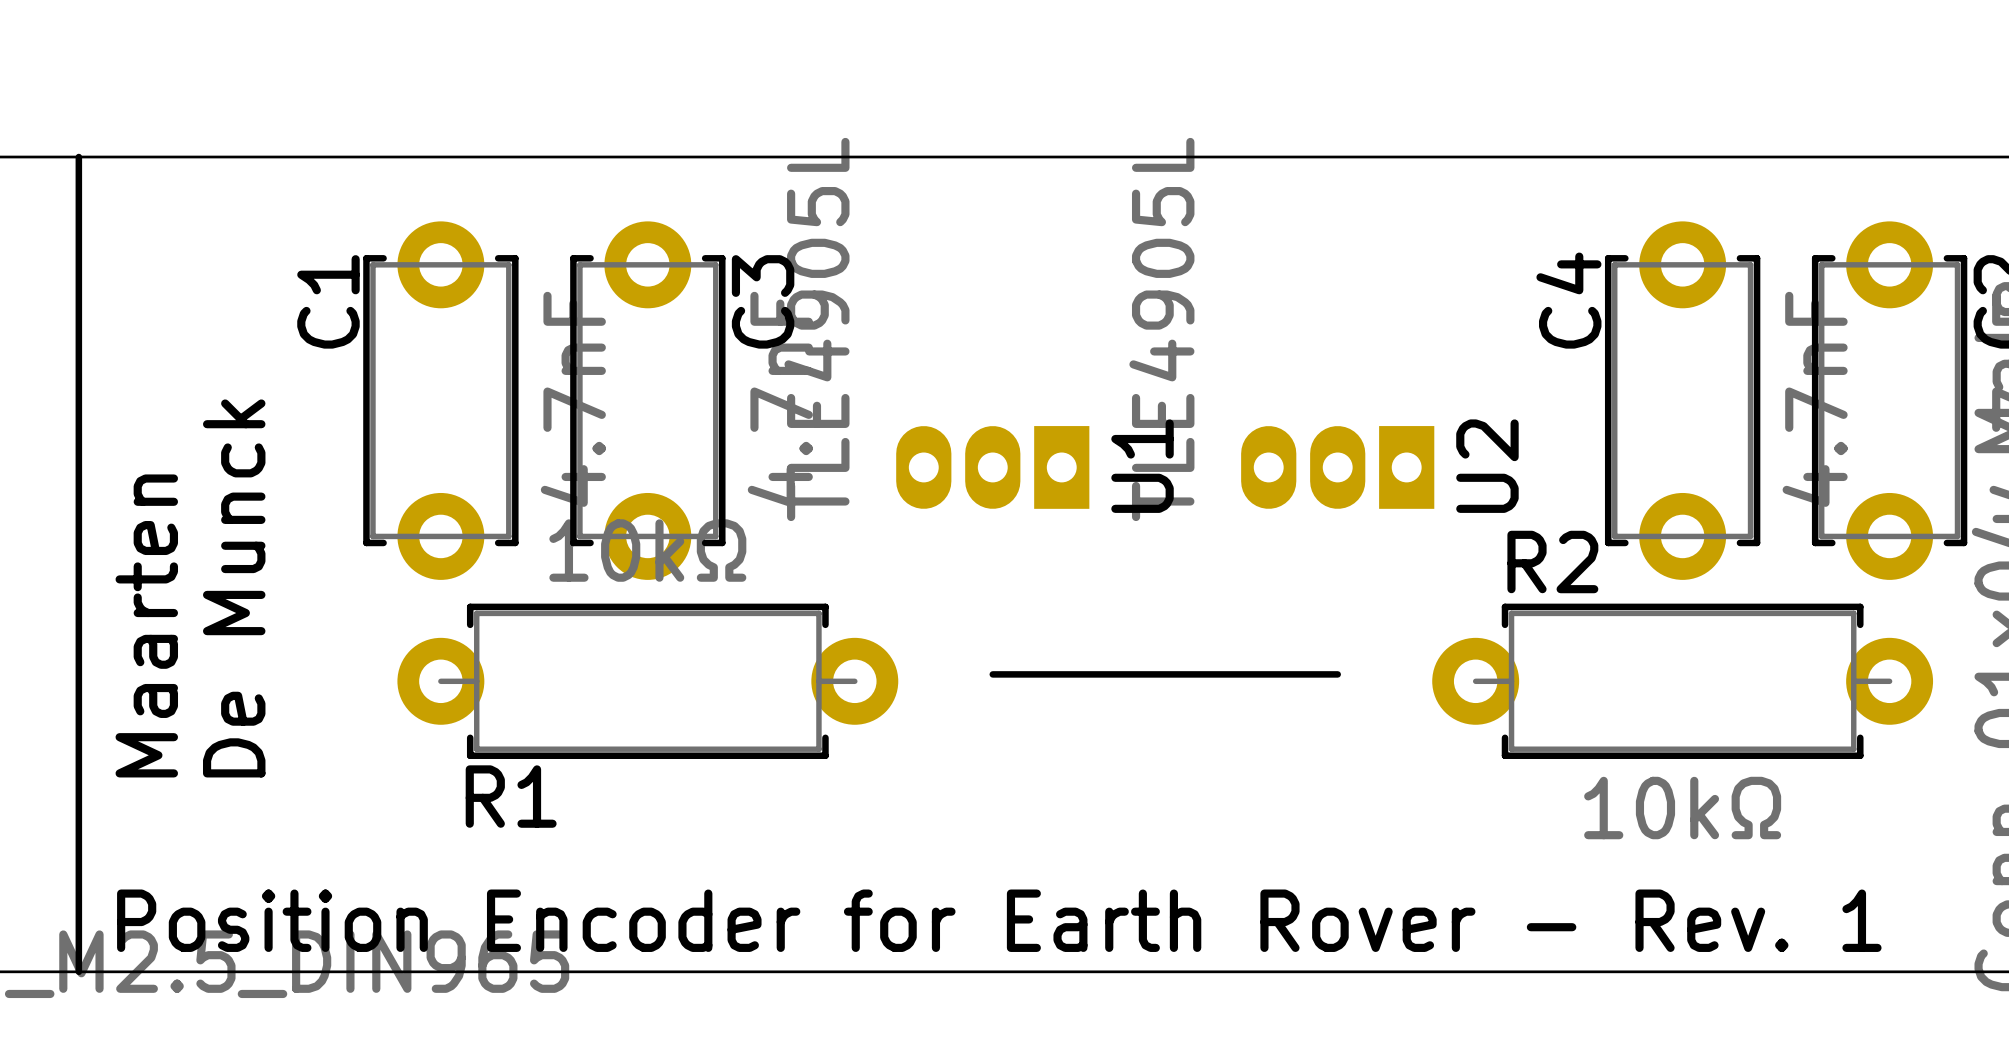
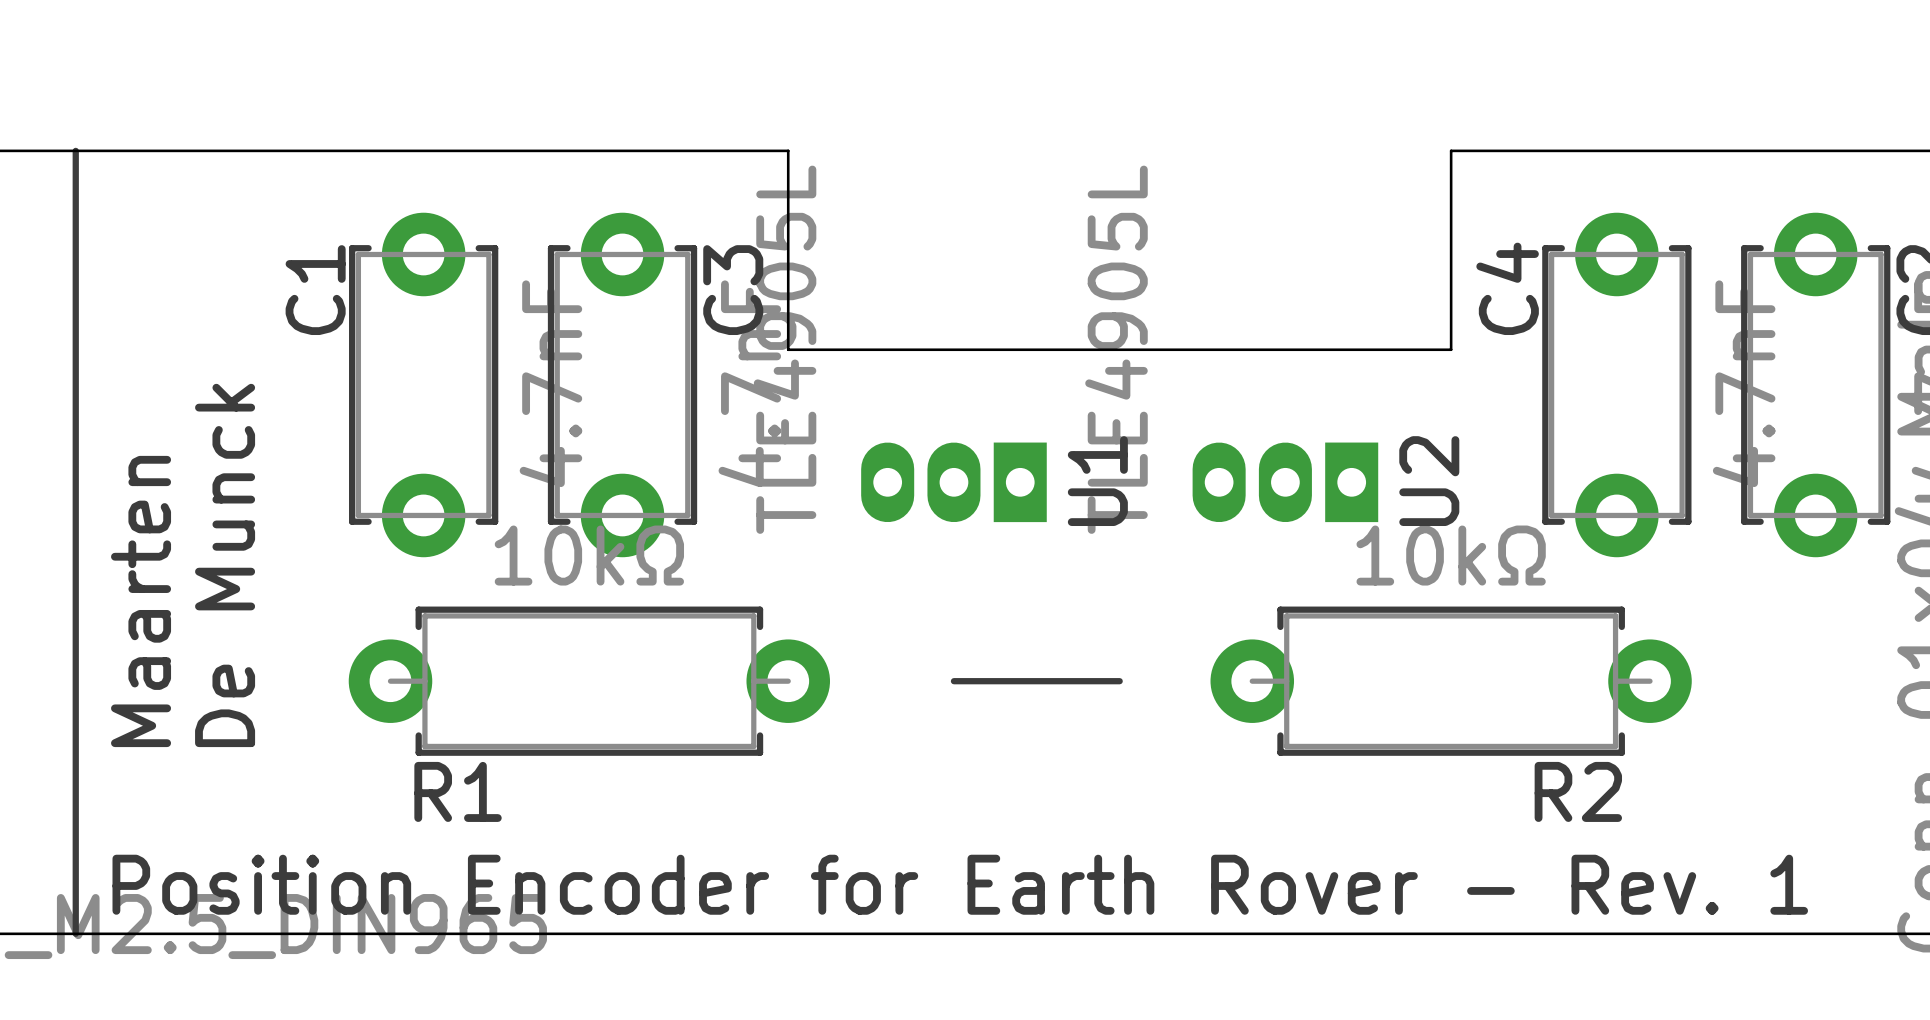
board edge: (820, 157) (1510, 157) -> (788, 150) (788, 349) (1451, 349) (1451, 150)
U1 position: (992, 467) -> (953, 482)
U2 position: (1337, 467) -> (1285, 482)
R2 name position: R2 (1552, 562) -> R2 (1578, 791)
line: (992, 674) (1337, 674) -> none
R1 position: (647, 681) -> (589, 681)
R2 position: (1682, 681) -> (1451, 681)
line: none -> (953, 681) (1119, 681)
R2 value position: 10kΩ (1682, 808) -> 10kΩ (1451, 555)

